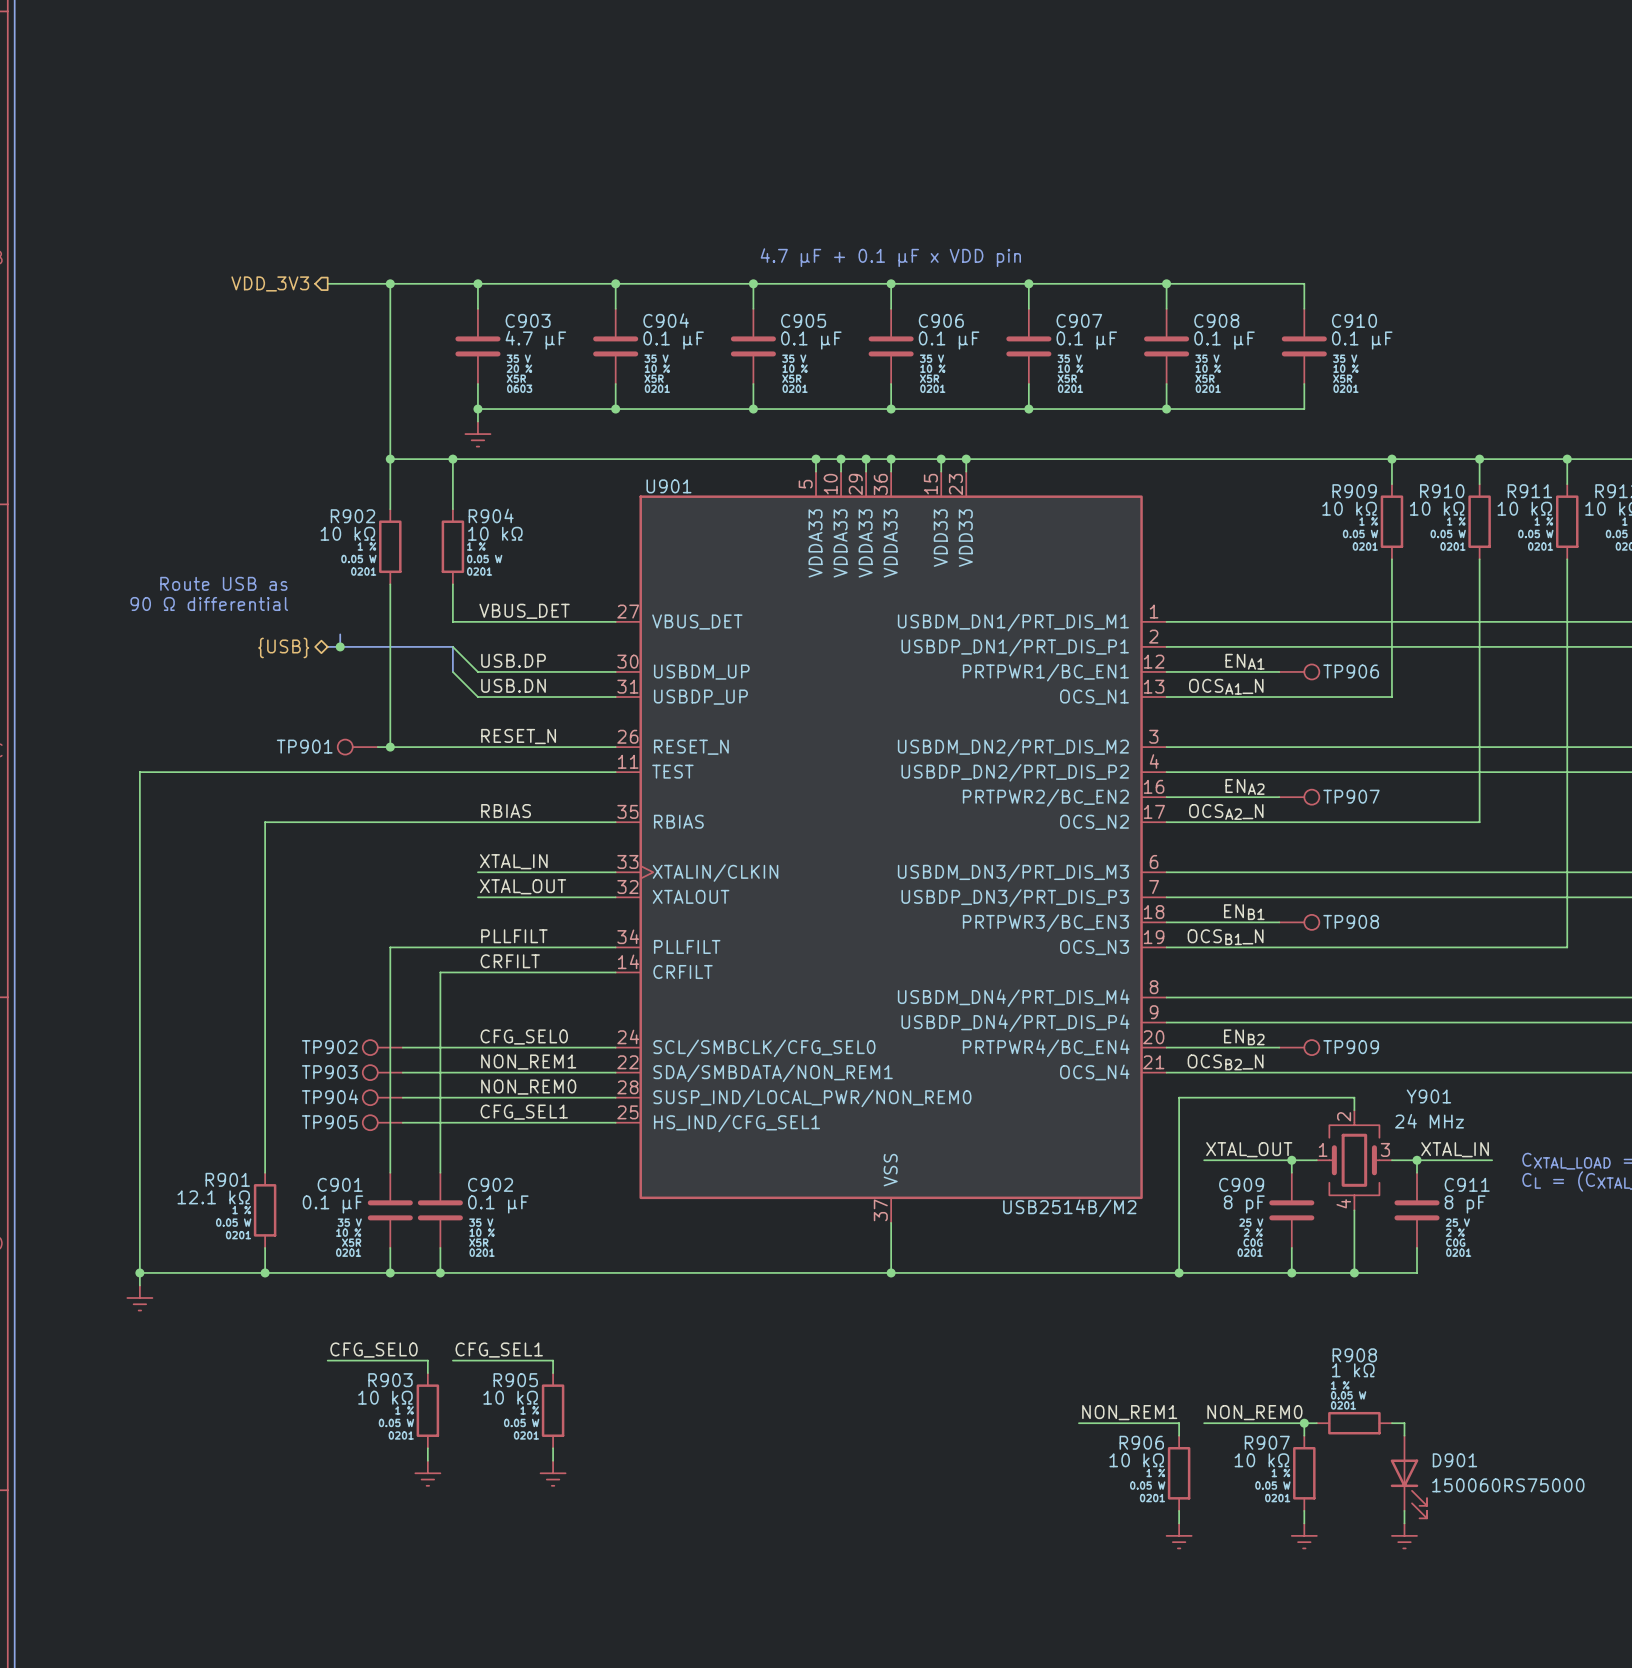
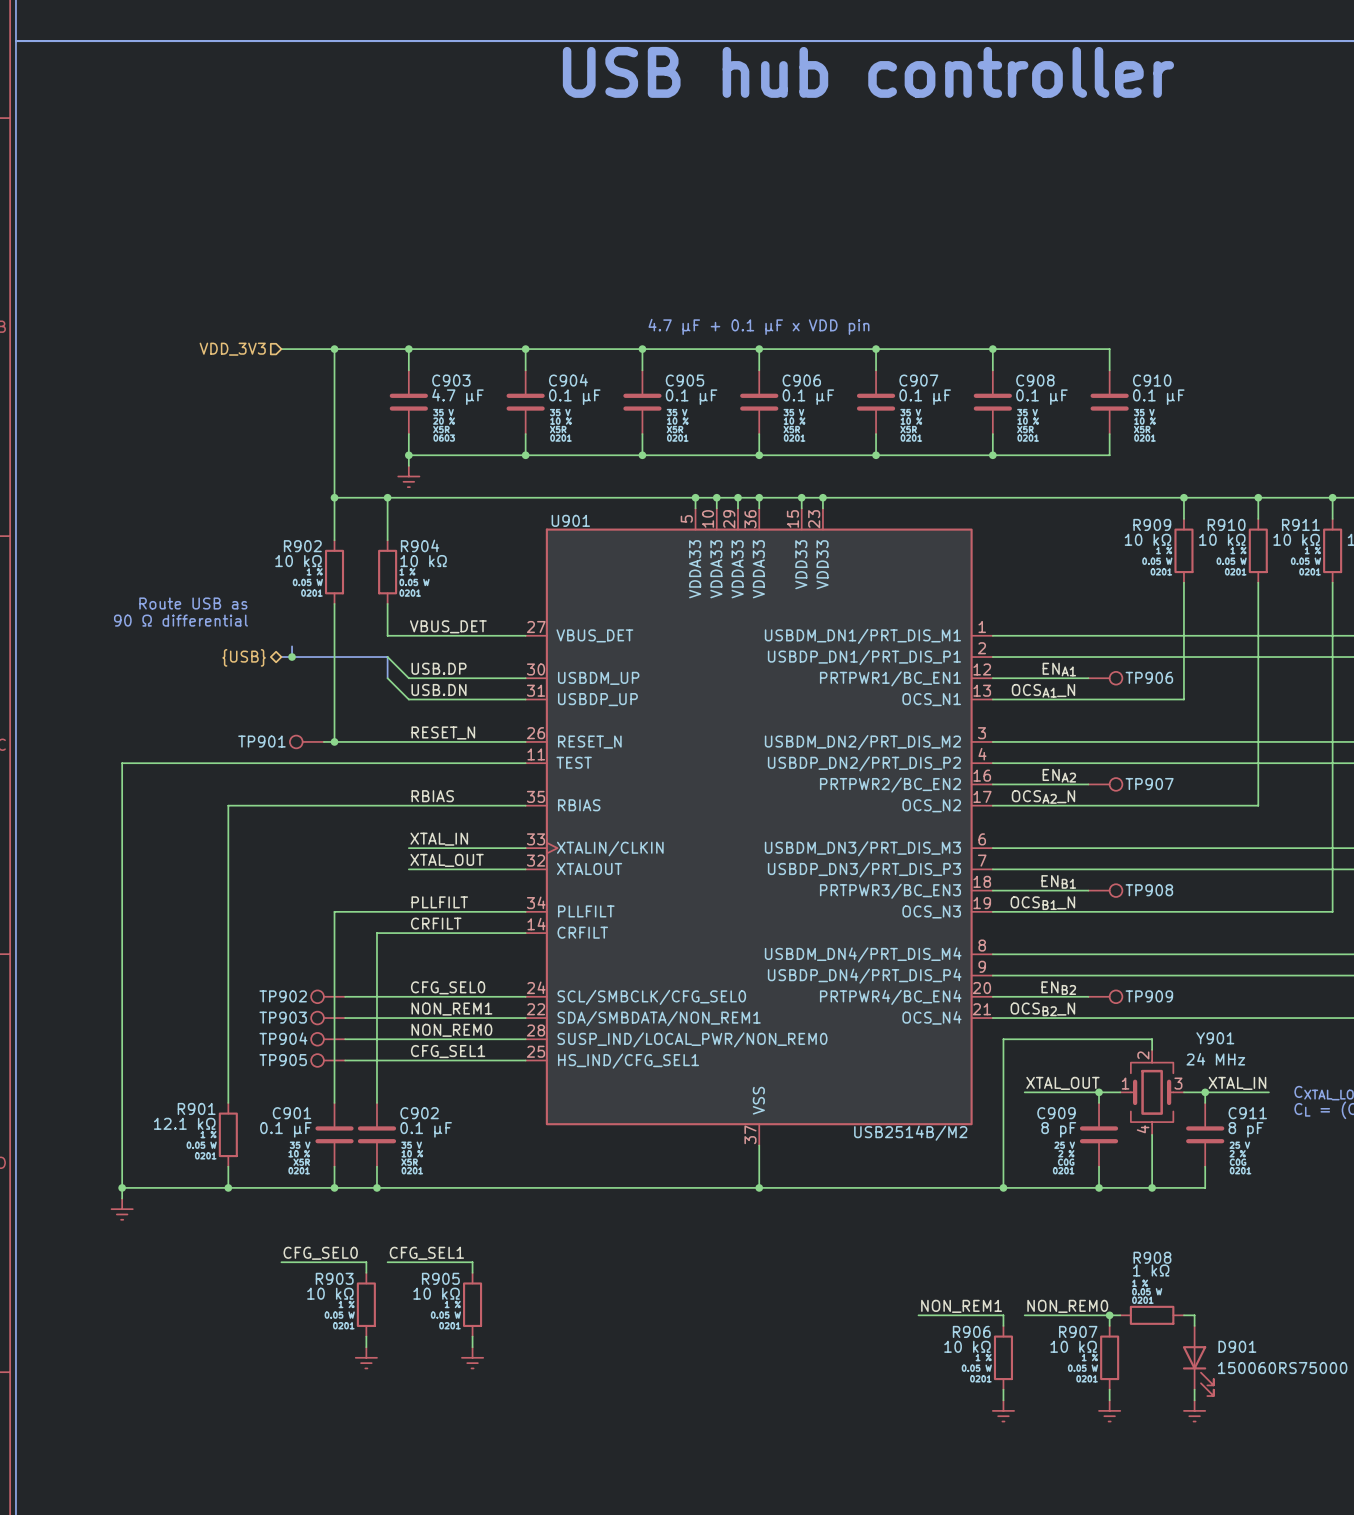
hierarchical label shape: output (270, 283) -> input (232, 349)

